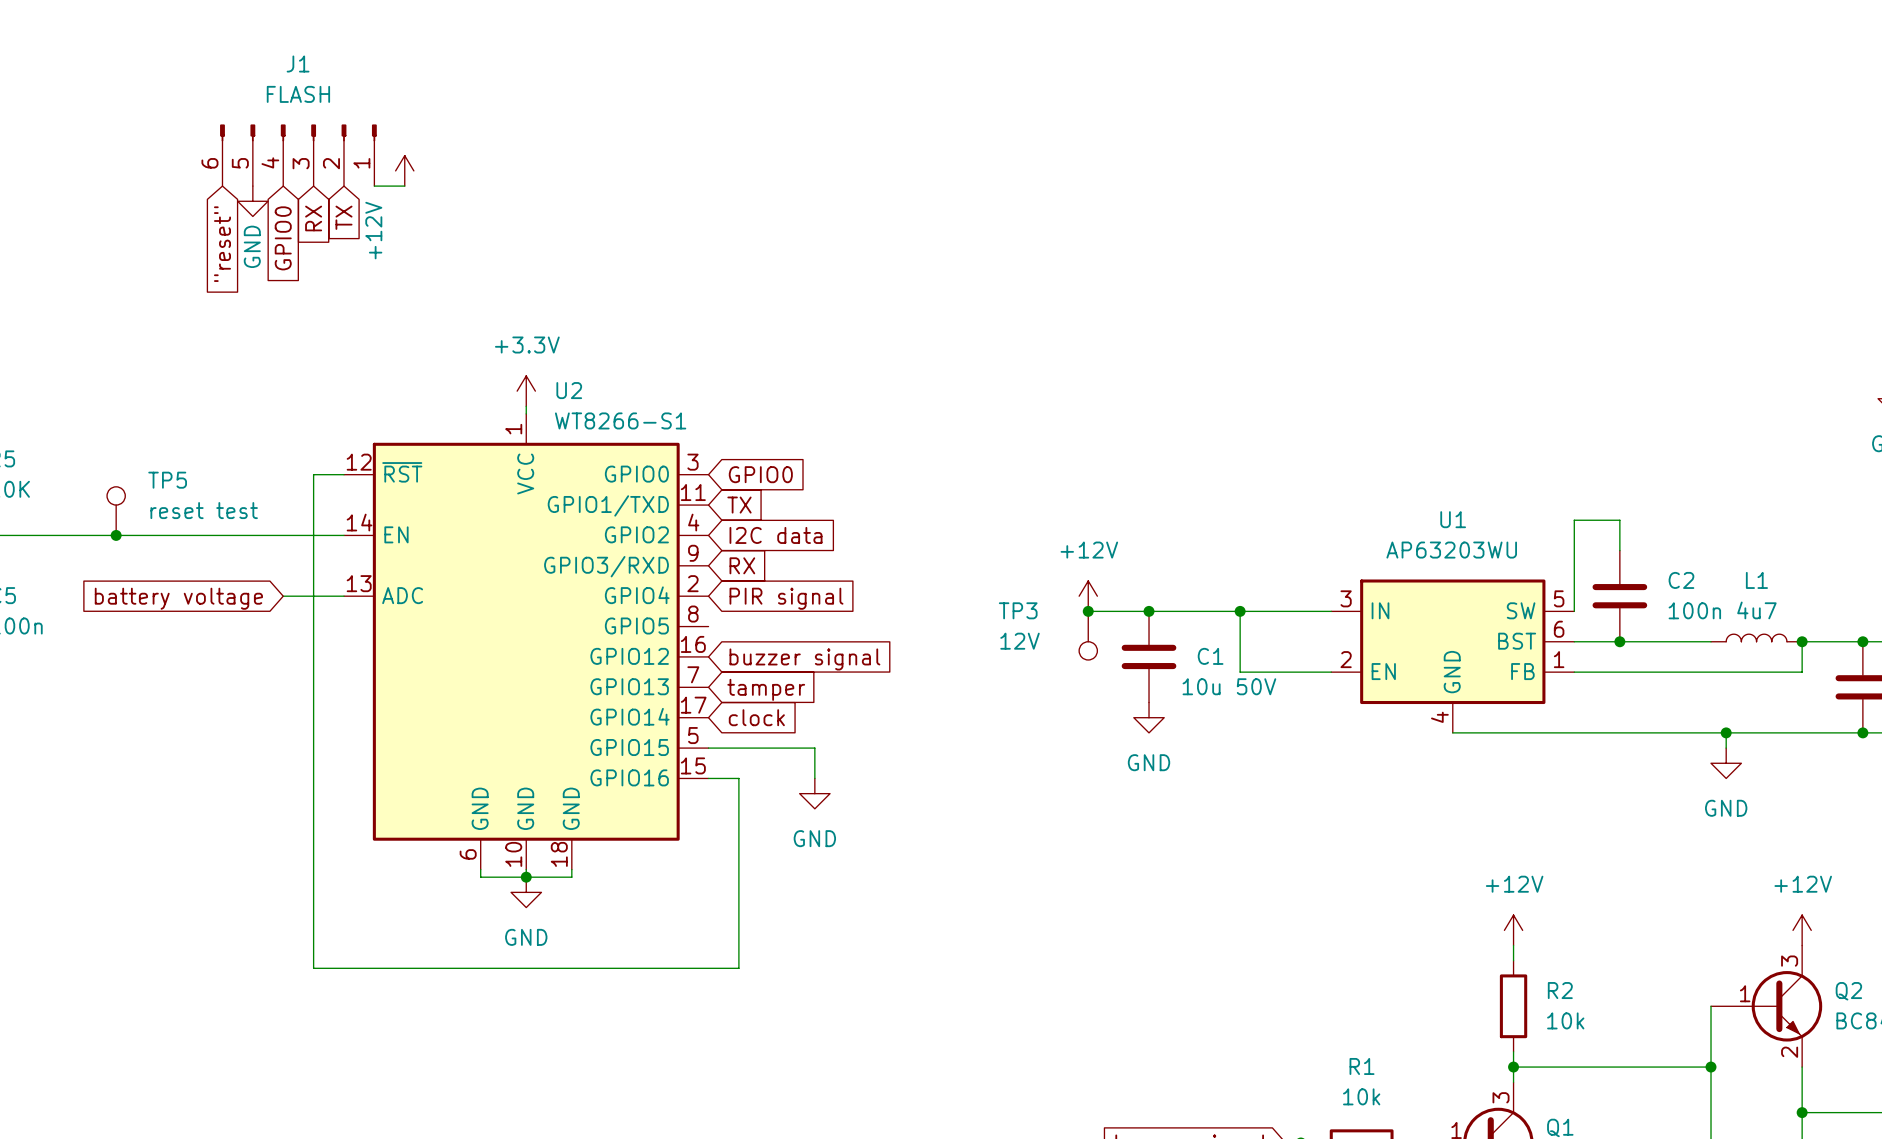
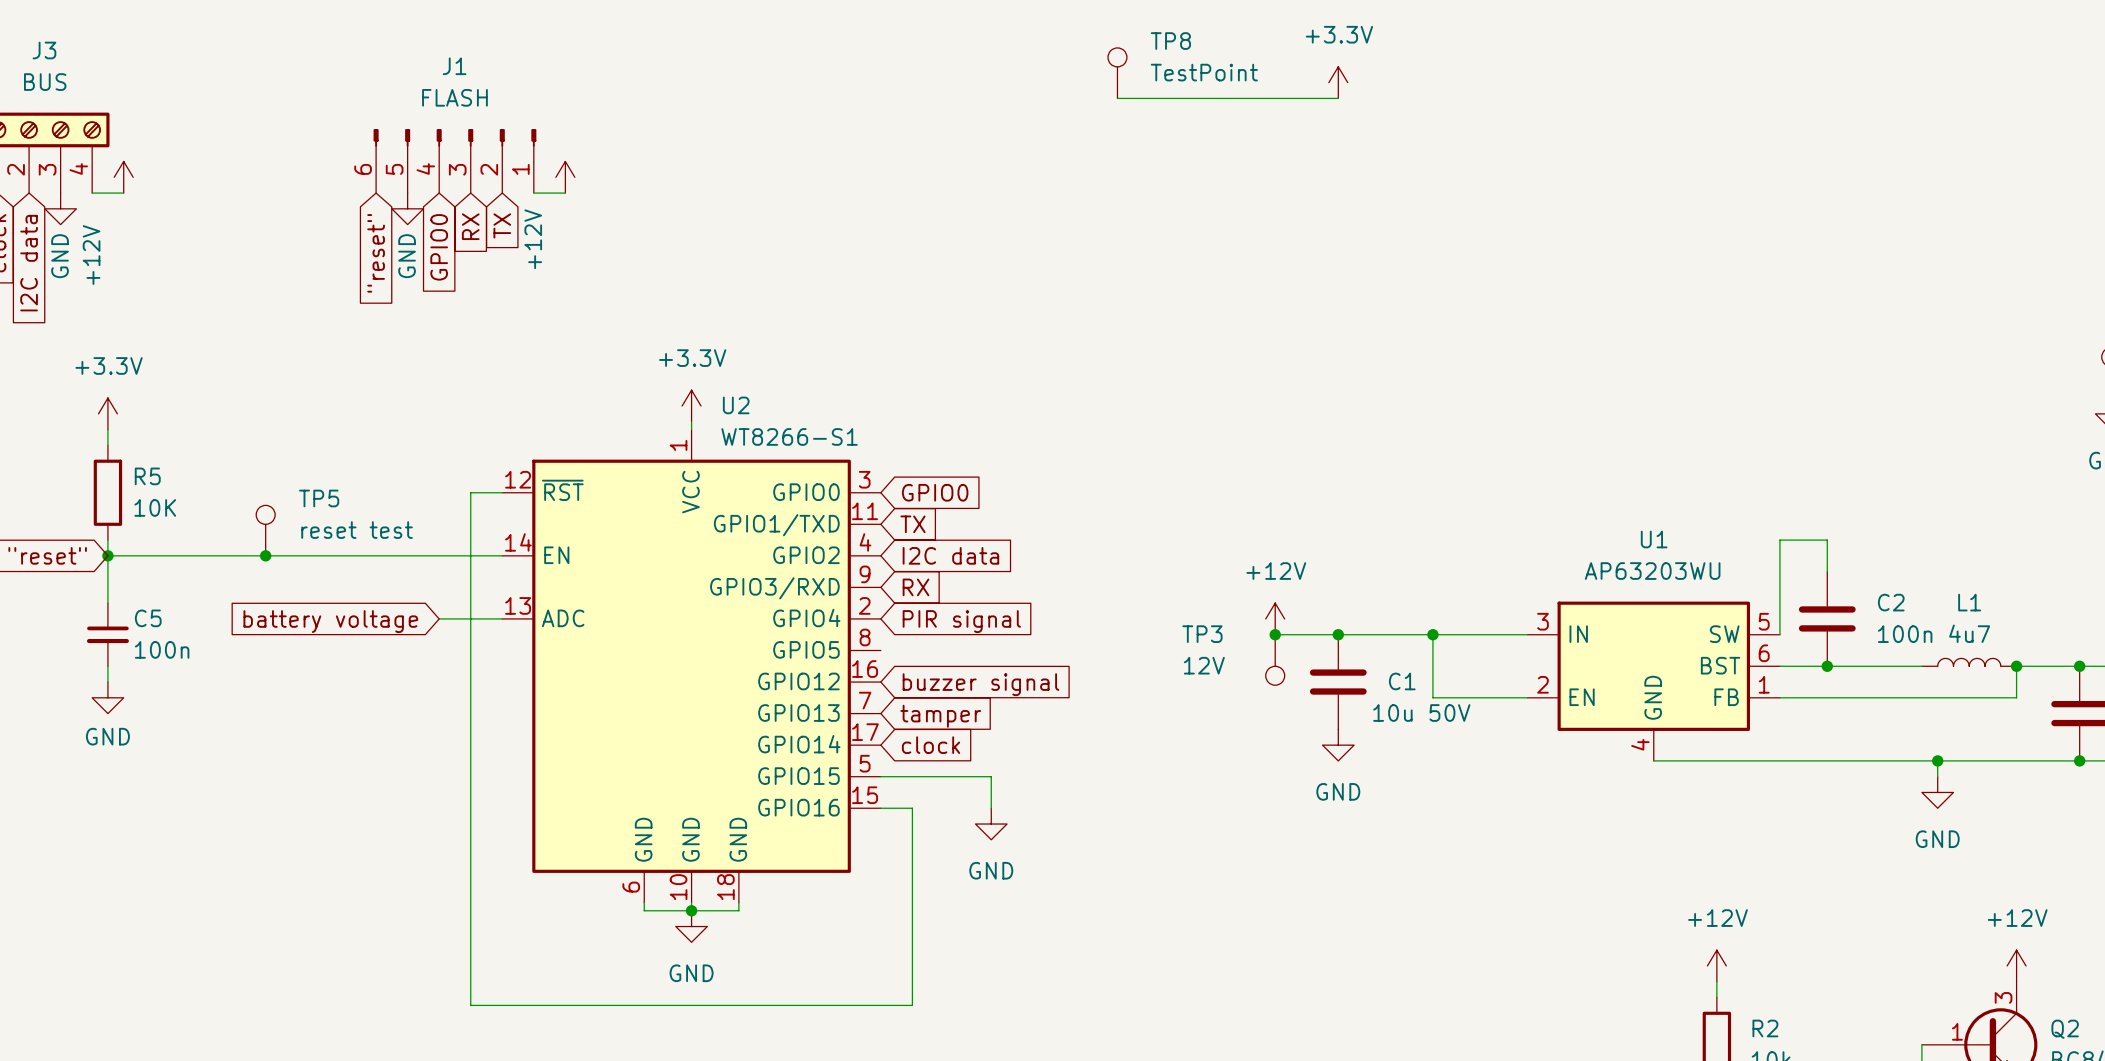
TP8: none -> TestPoint (1117, 73)
power symbol: none -> +3.3V (1338, 82)
wire: none -> (1117, 98) (1338, 98)

